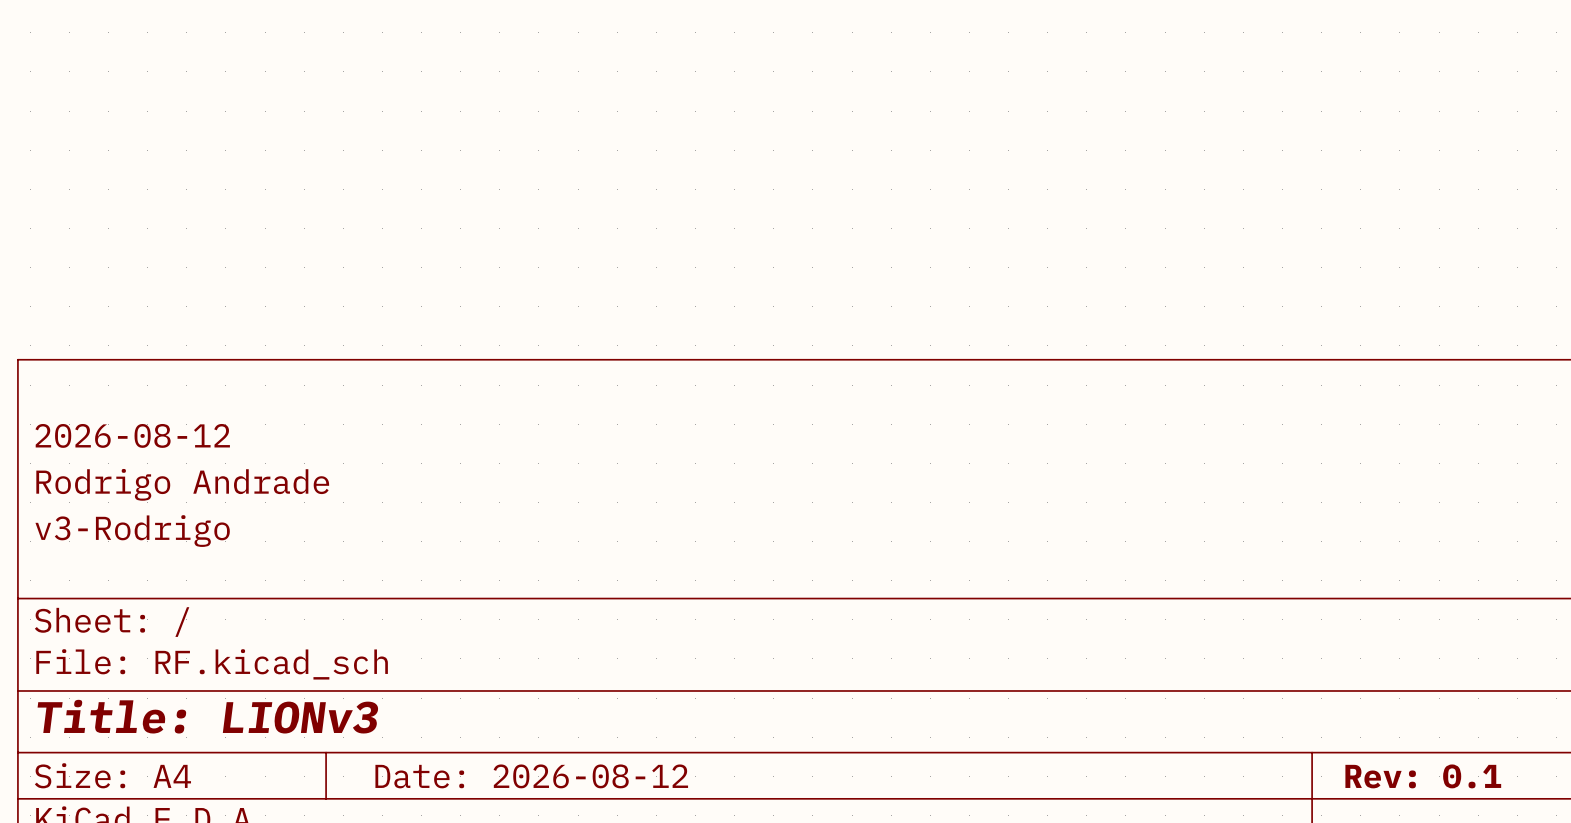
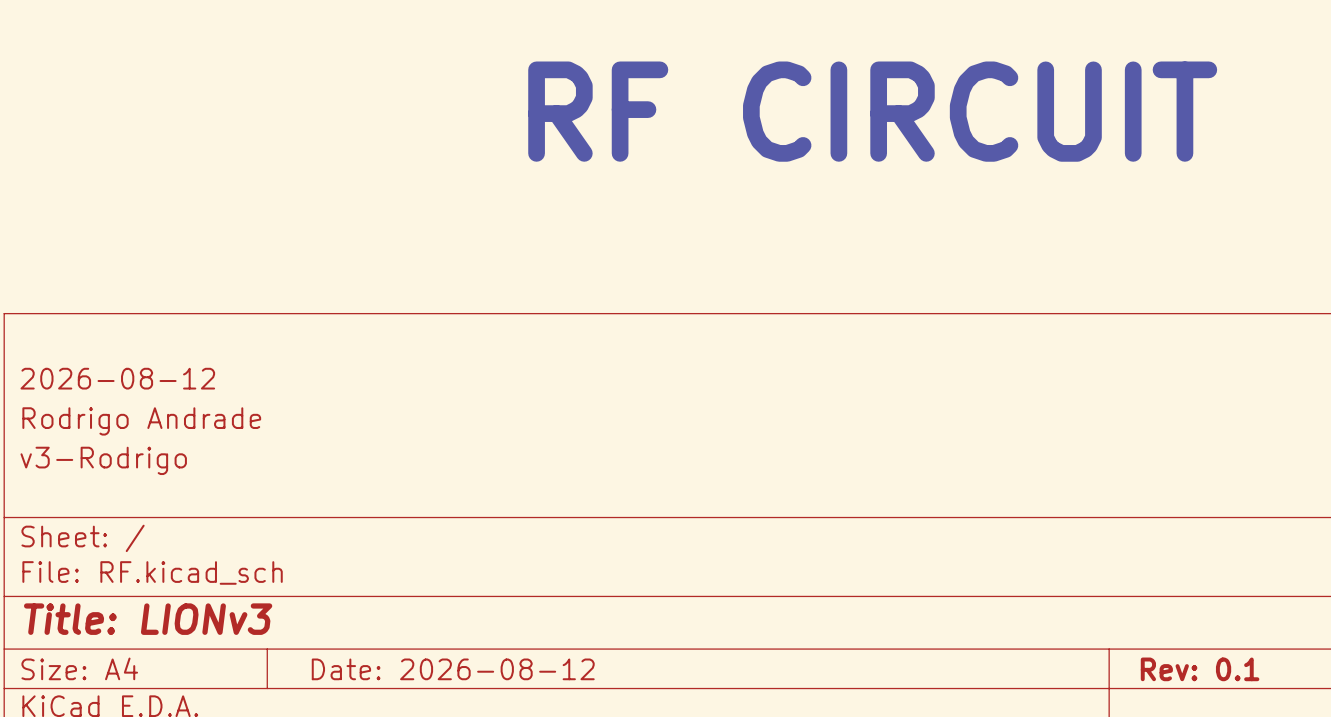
text: none -> RF CIRCUIT (872, 111)

